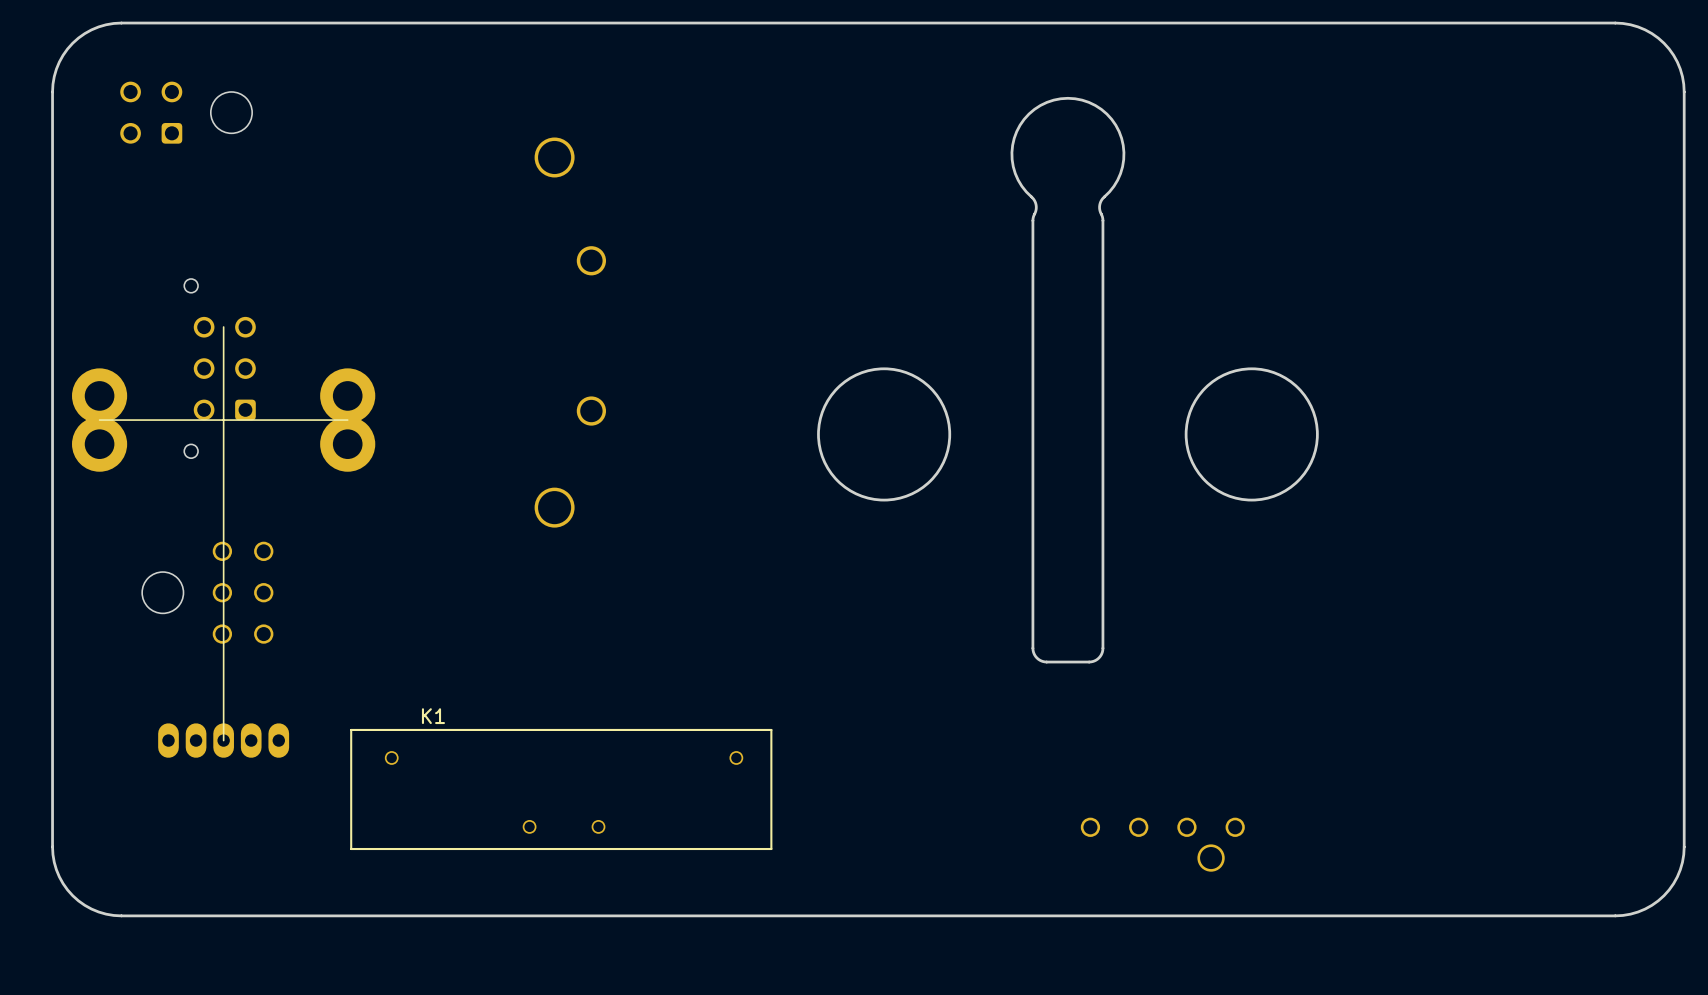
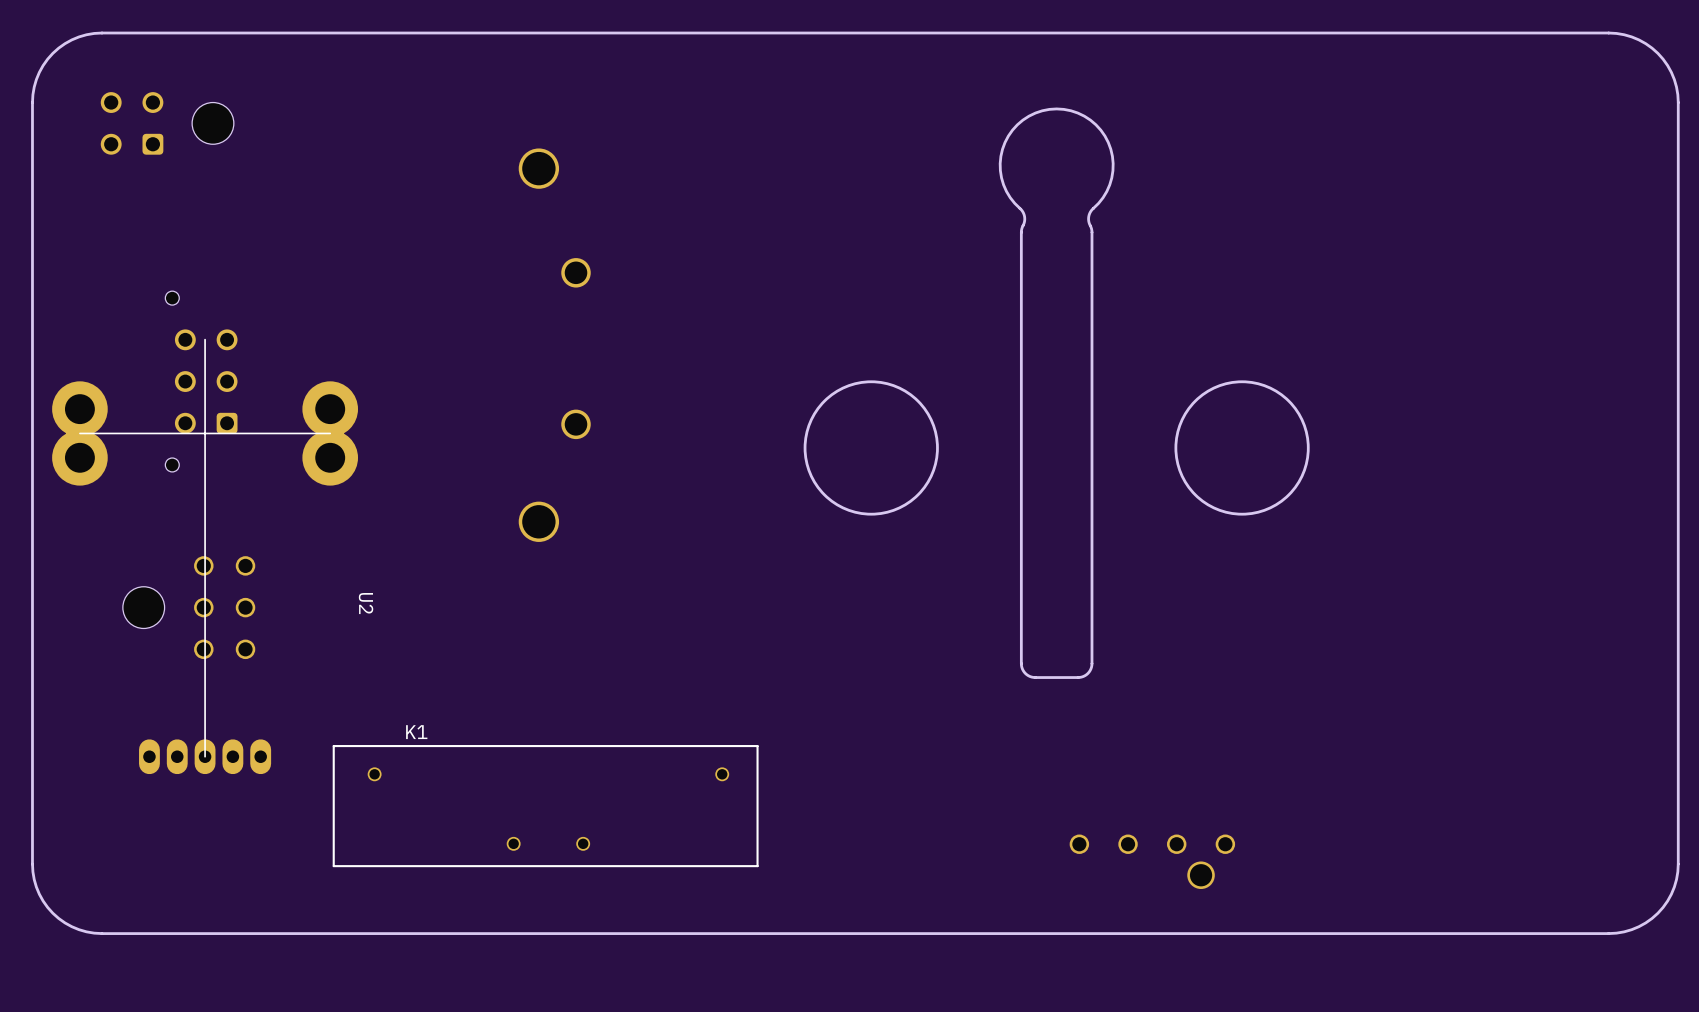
U2 name: none -> U2 (366, 603)

